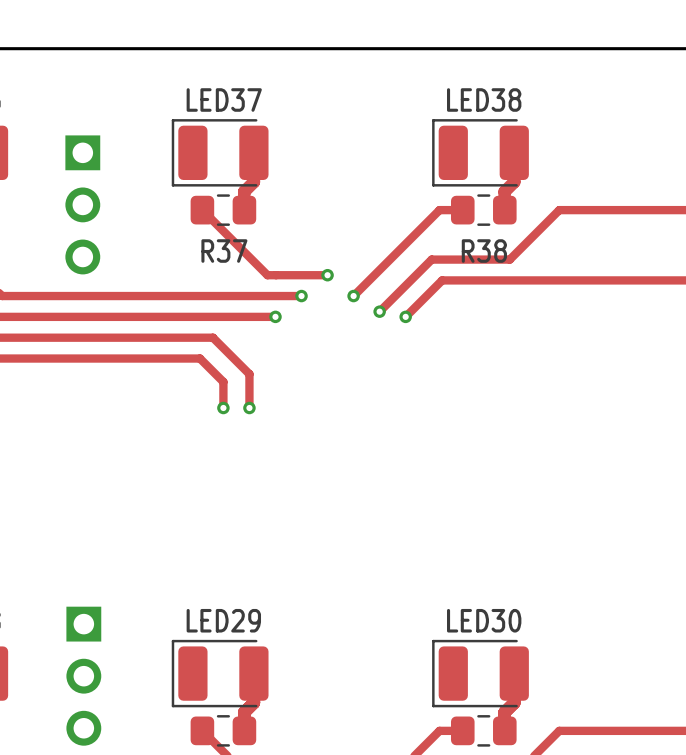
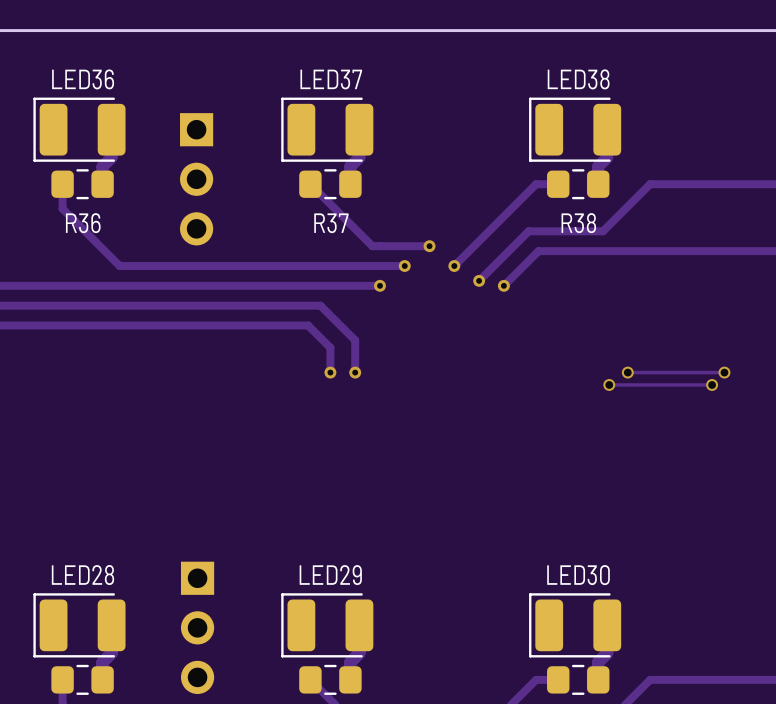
track: none -> (627, 372) (724, 372)
via: none -> (627, 372)
via: none -> (724, 372)
via: none -> (609, 384)
track: none -> (610, 384) (712, 384)
via: none -> (712, 384)

